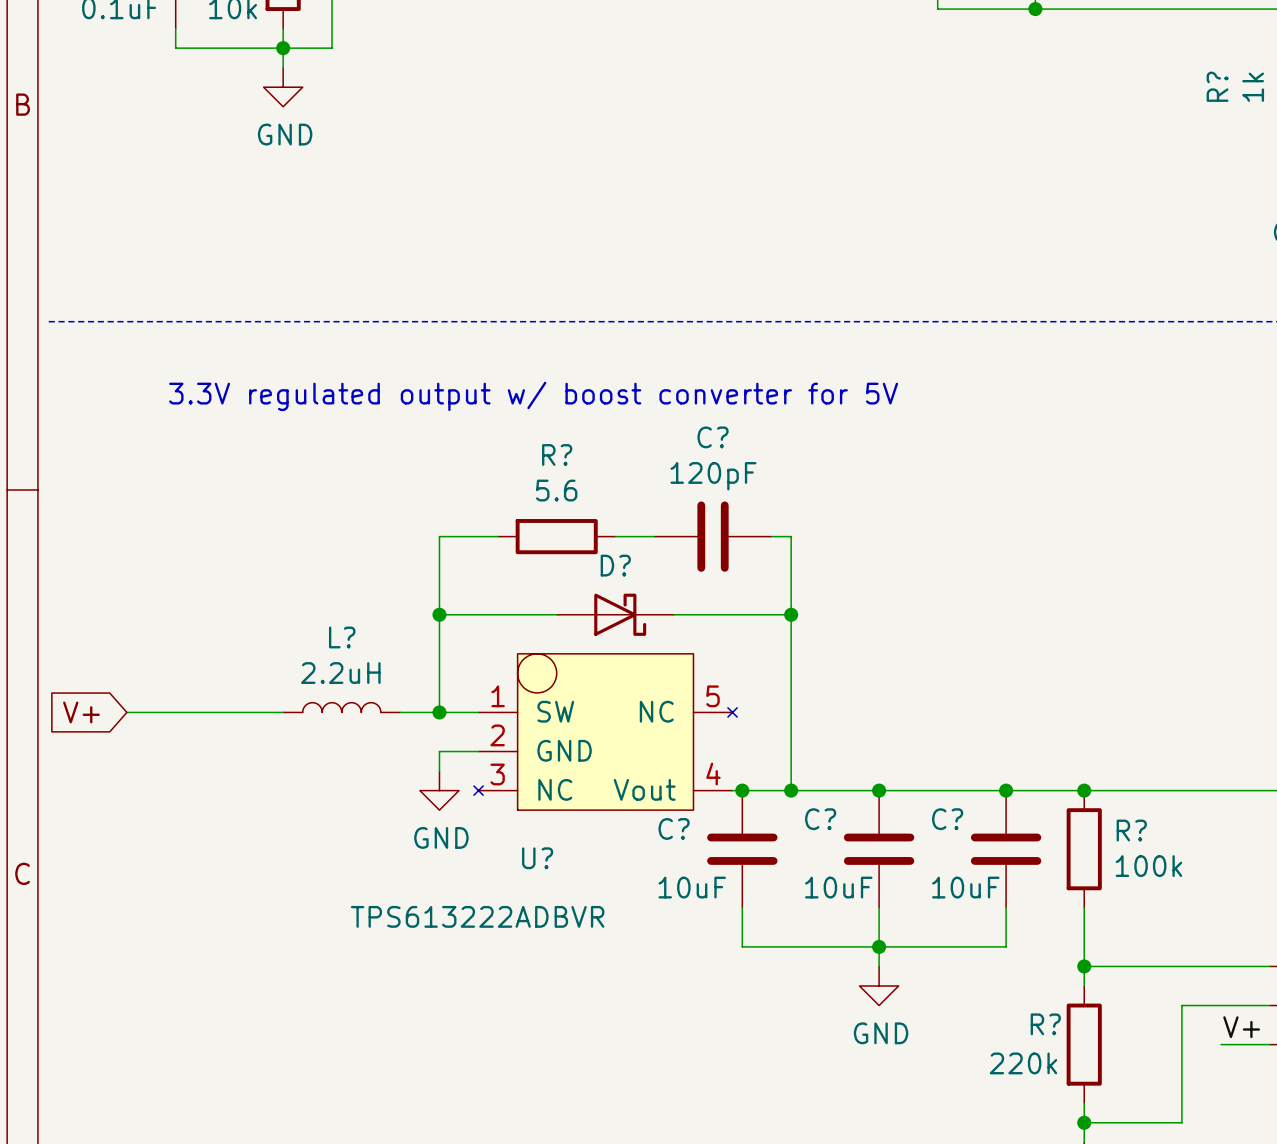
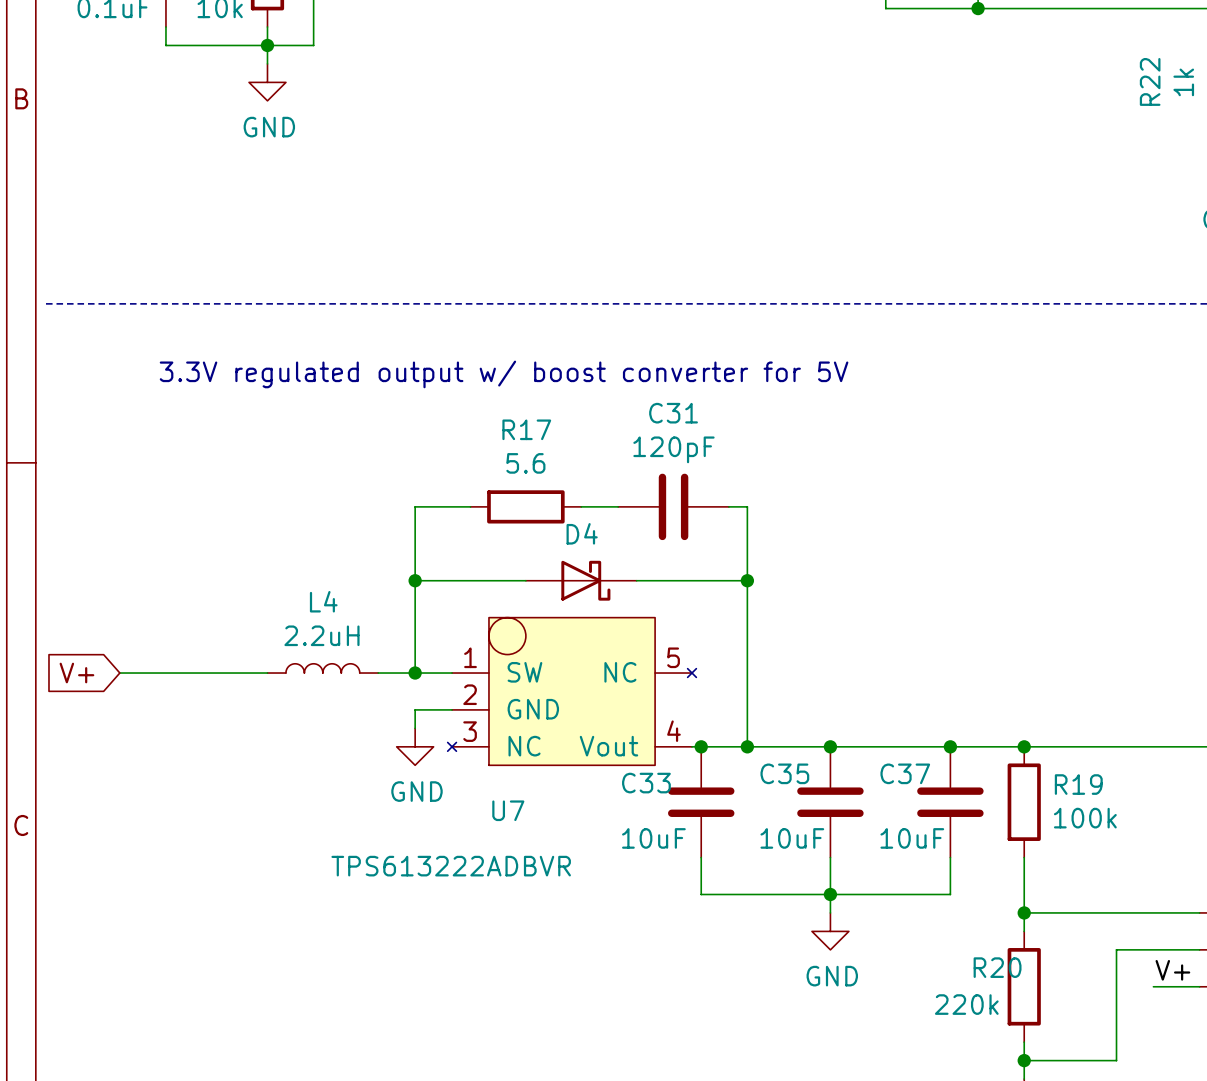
R? name: R? (1217, 86) -> R22 (1150, 81)
C? name: C? (713, 437) -> C31 (673, 413)
R? name: R? (557, 454) -> R17 (526, 429)
D? name: D? (615, 565) -> D4 (582, 533)
L? name: L? (342, 637) -> L4 (323, 601)
C? name: C? (820, 819) -> C35 (784, 773)
C? name: C? (947, 819) -> C37 (905, 773)
C? name: C? (674, 828) -> C33 (646, 783)
R? name: R? (1131, 830) -> R19 (1078, 784)
U? name: U? (537, 858) -> U7 (508, 810)
R? name: R? (1045, 1024) -> R20 (997, 967)

